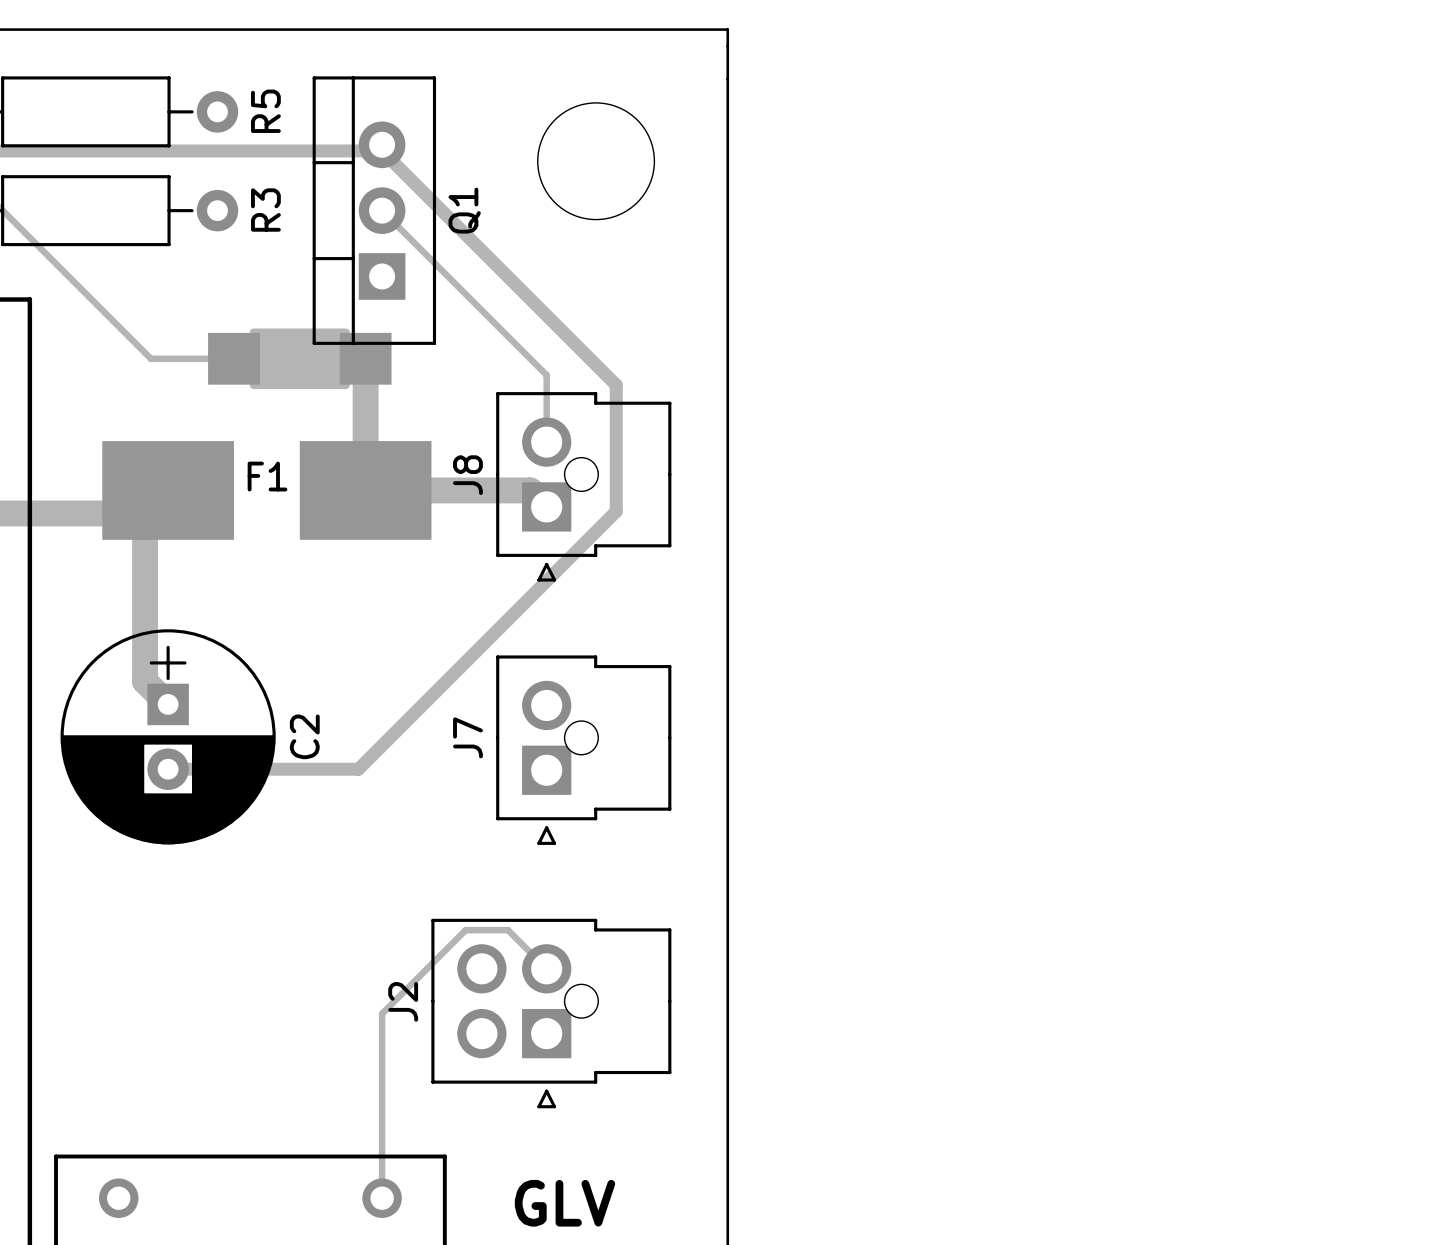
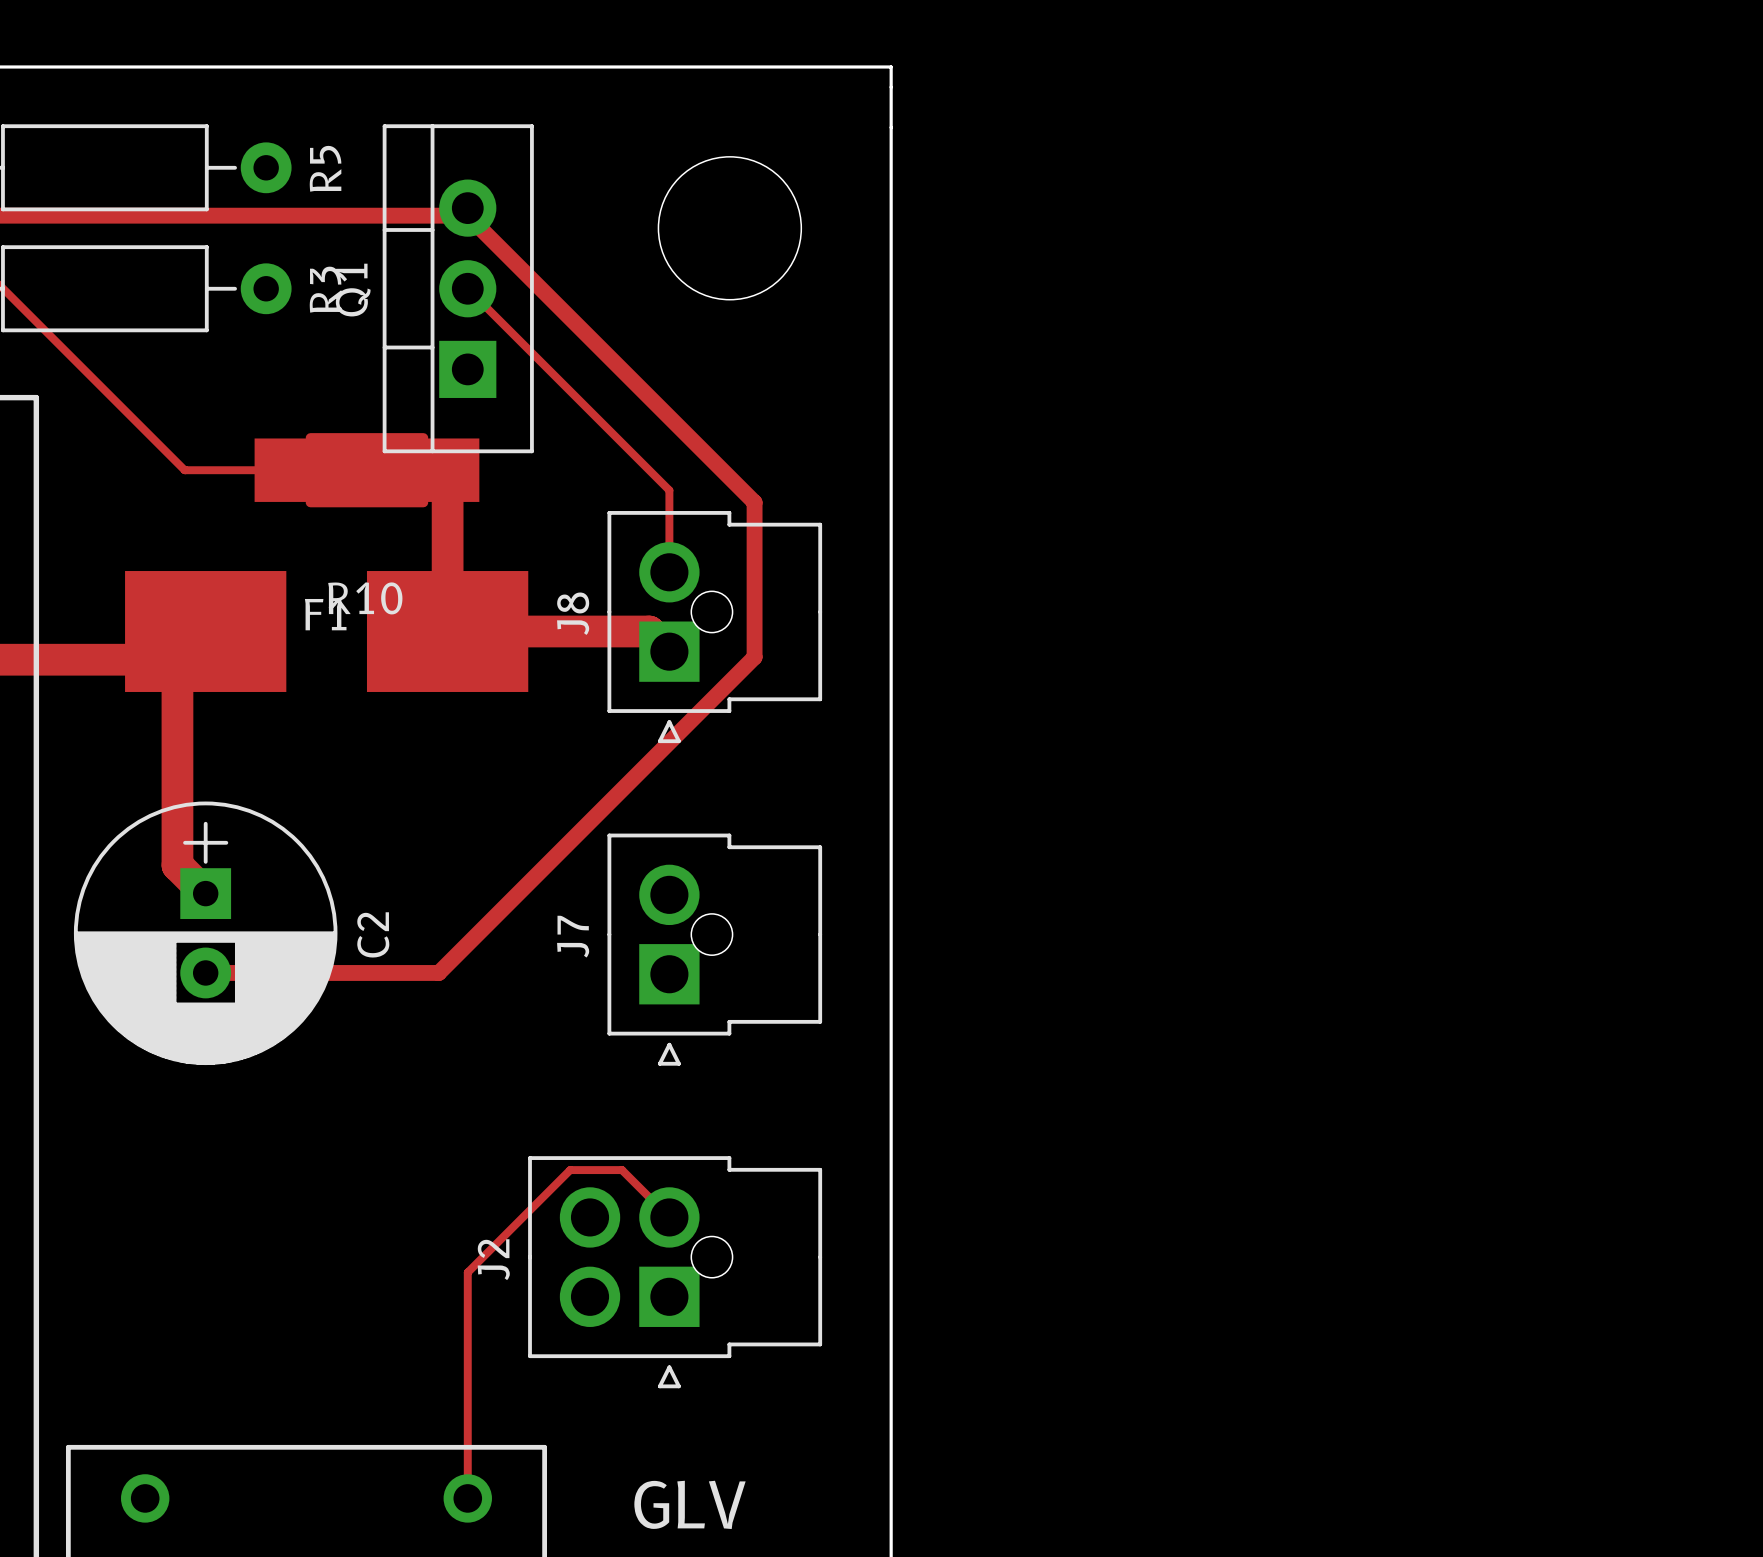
Q1 name position: Q1 (464, 210) -> Q1 (353, 290)
R10 name: none -> R10 (365, 598)

